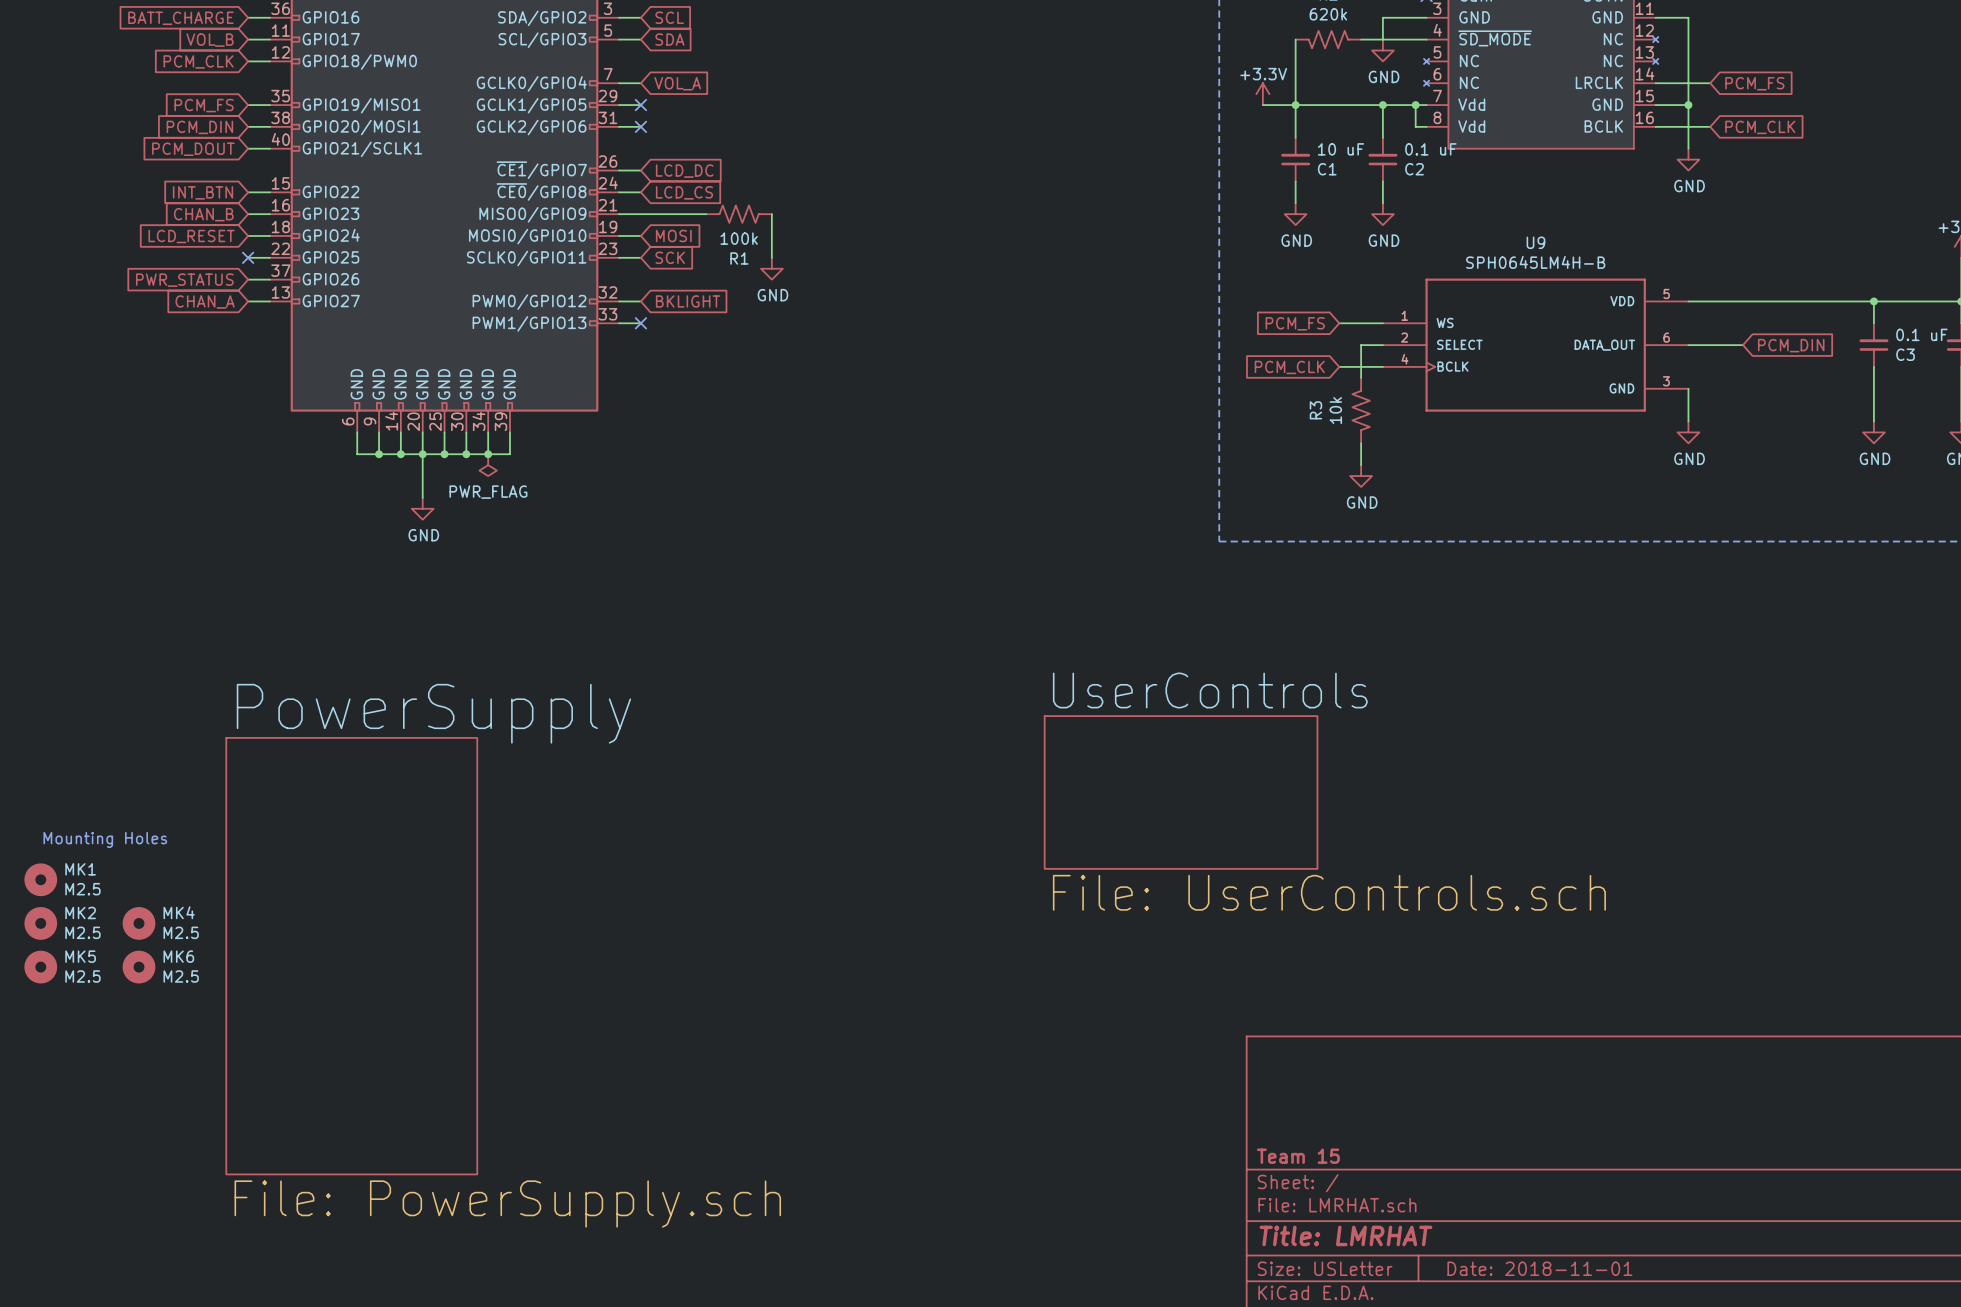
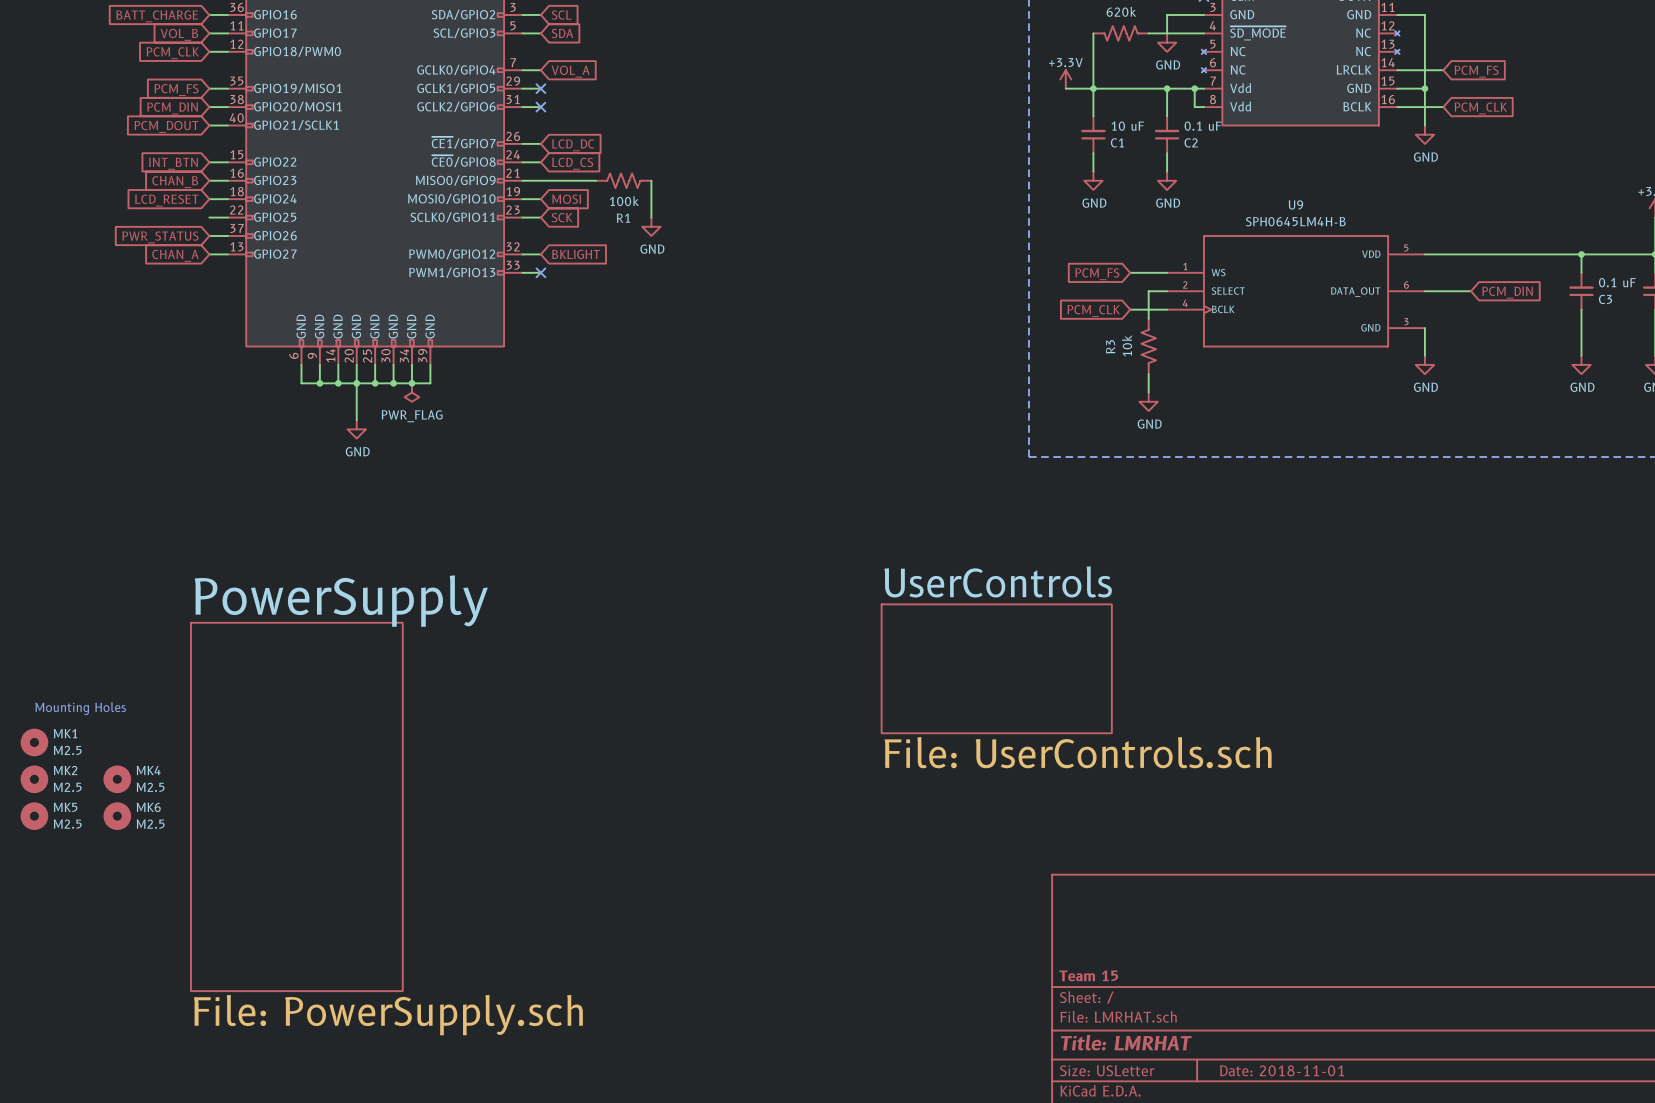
no-connect mark: (248, 257) -> none

